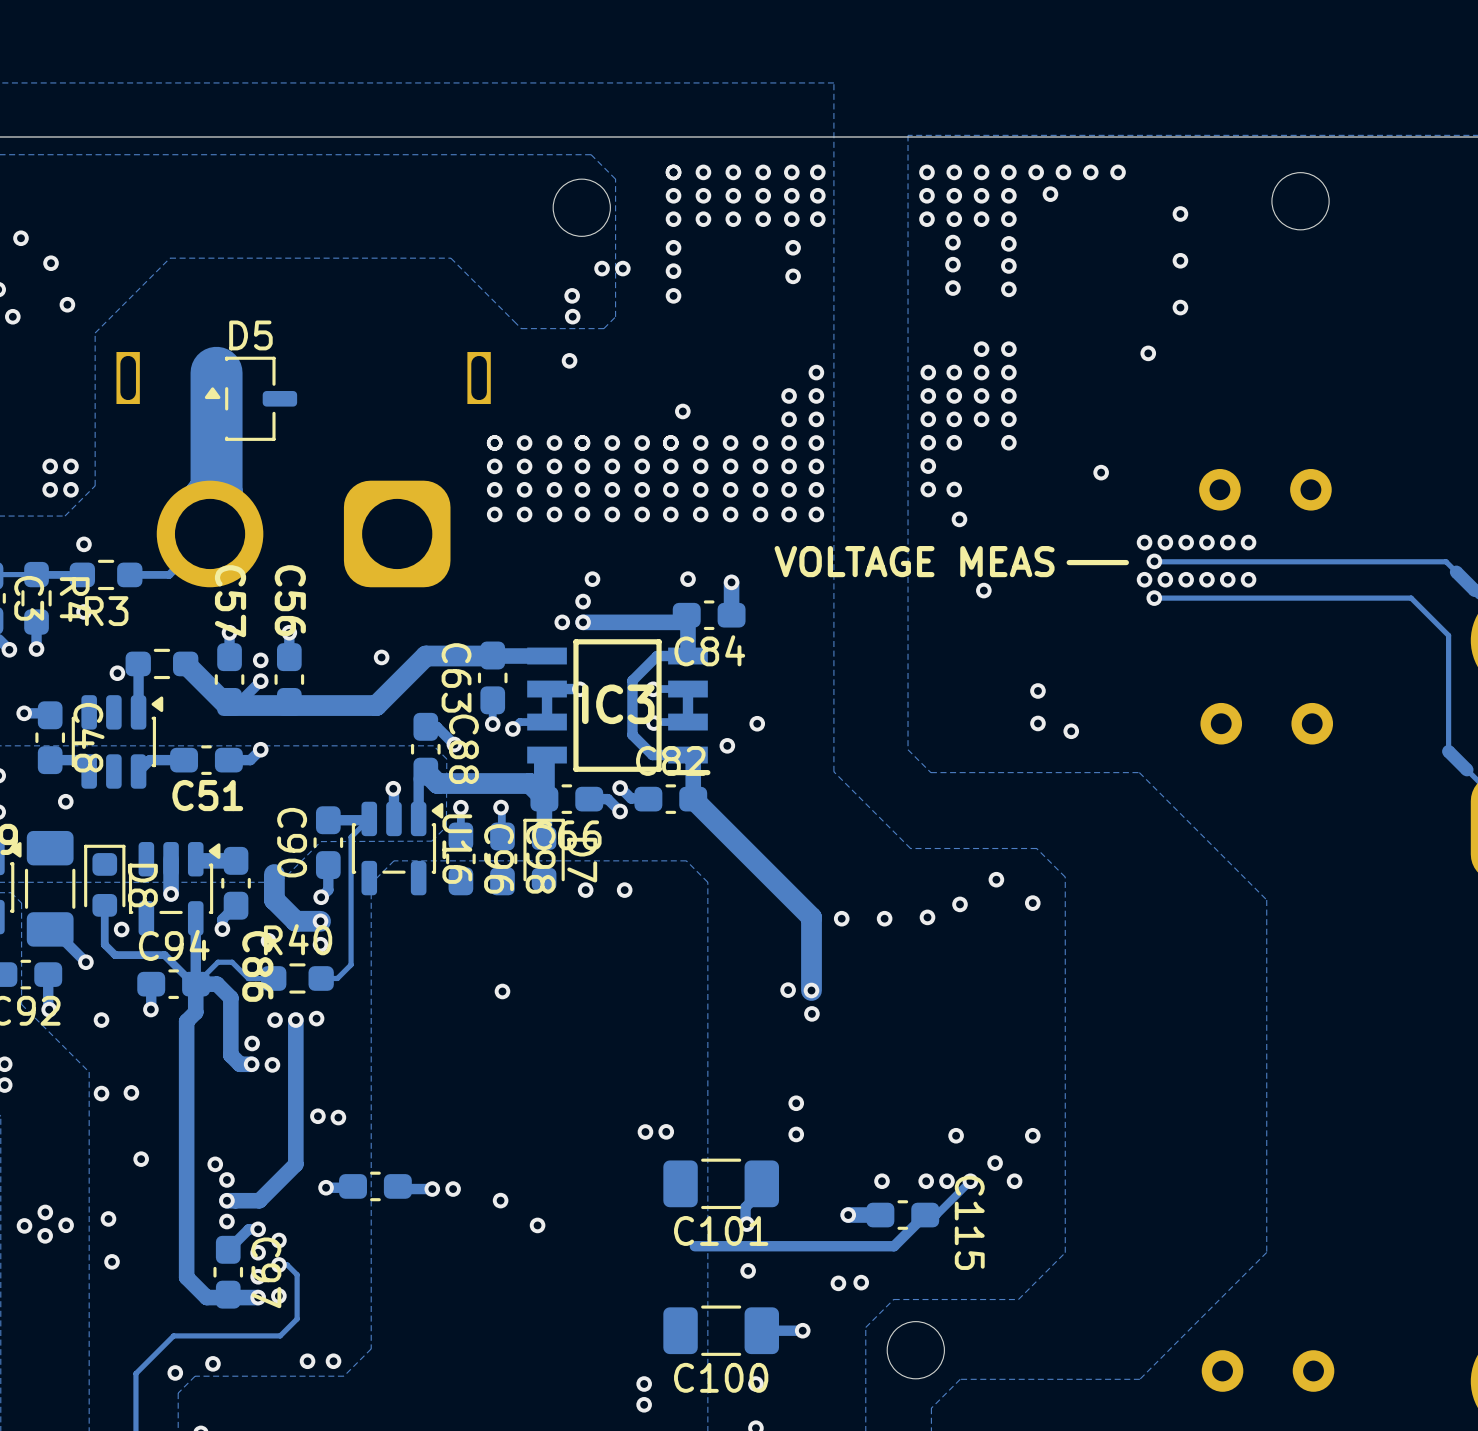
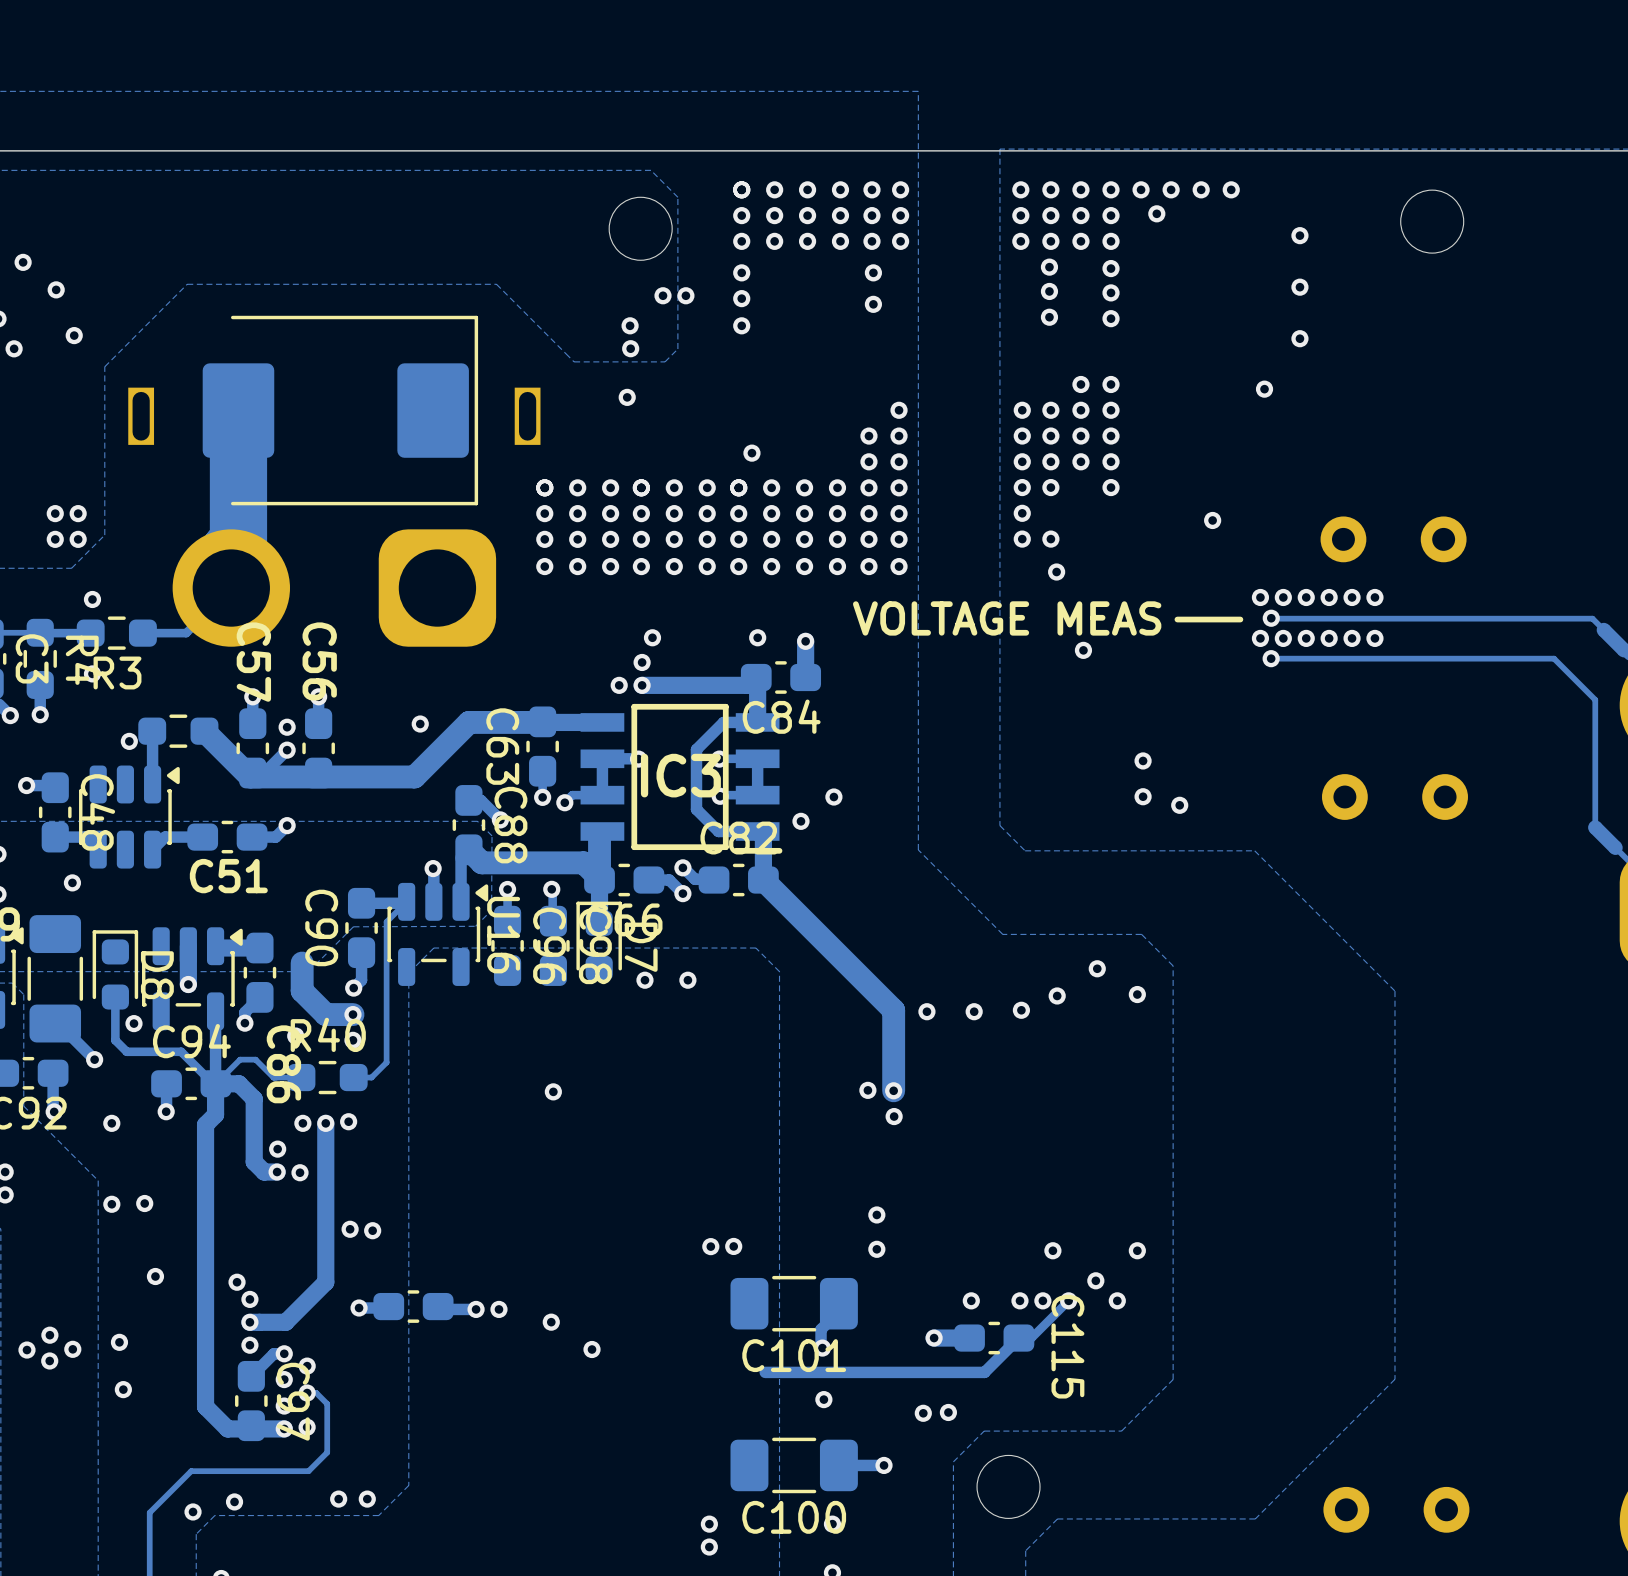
part: none -> (340, 410)
D5: (250, 398) -> none

